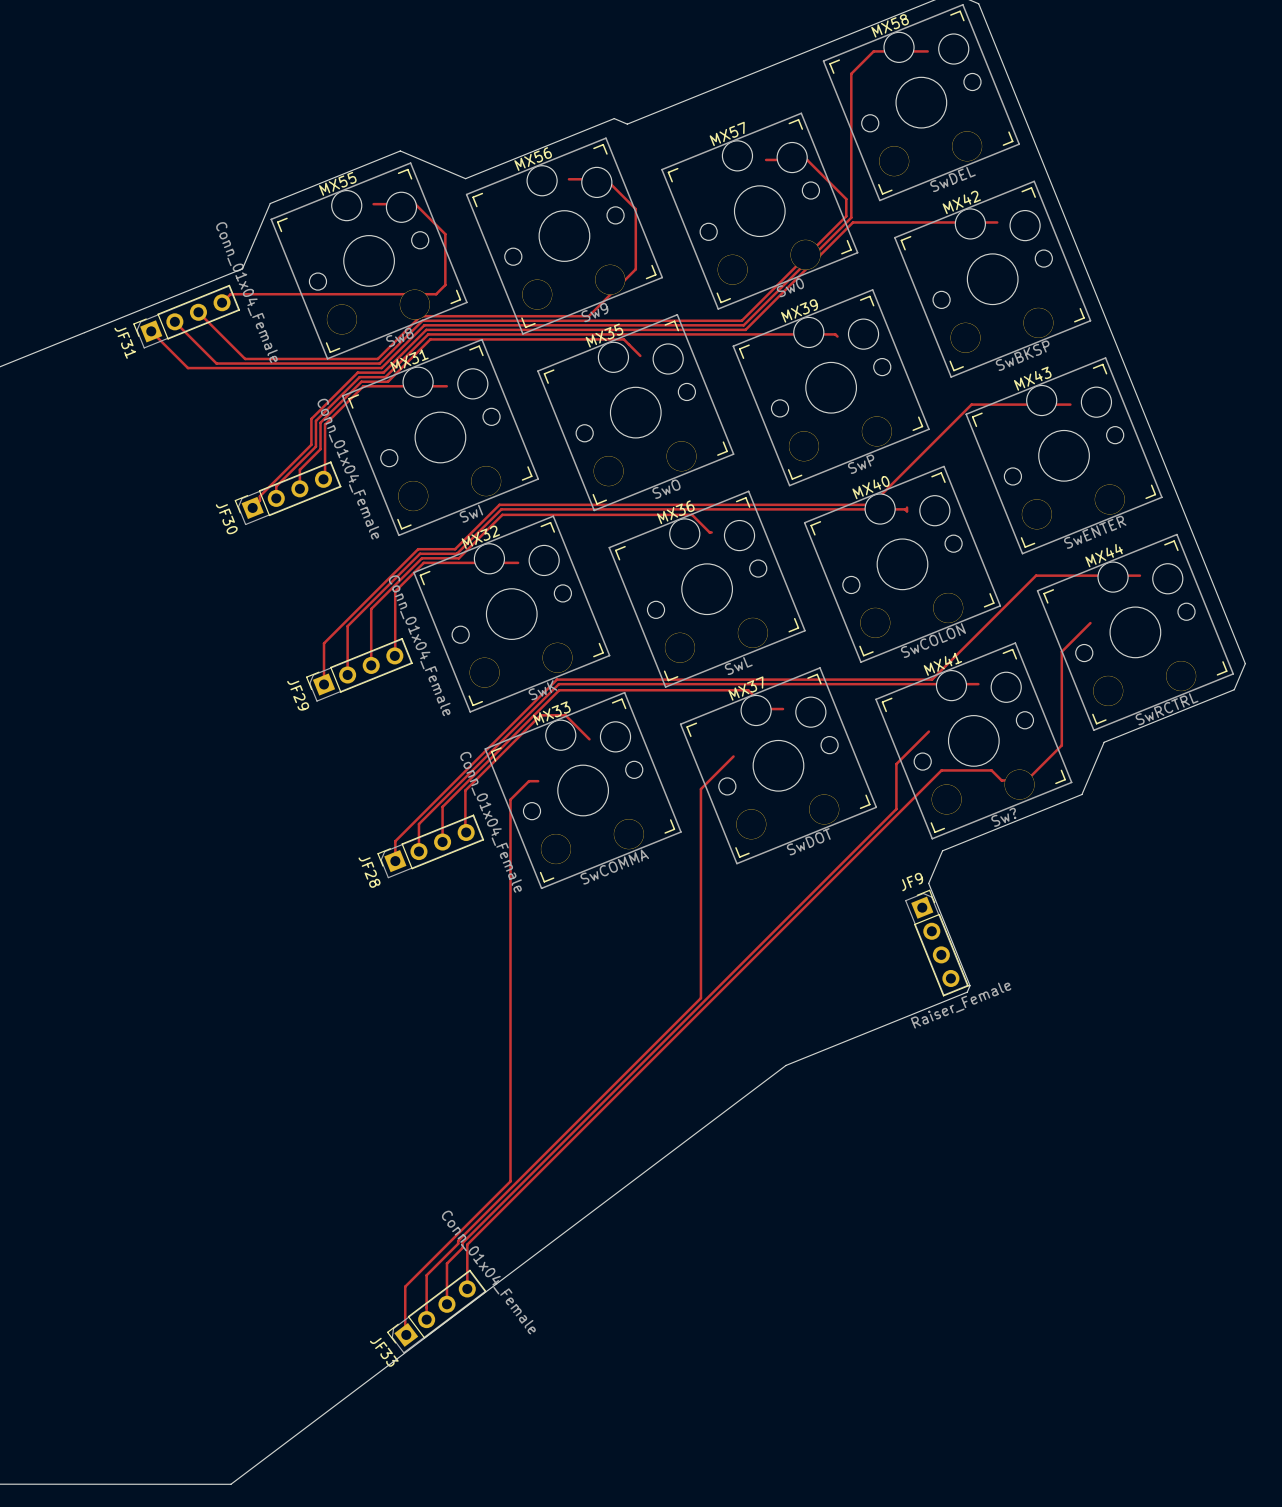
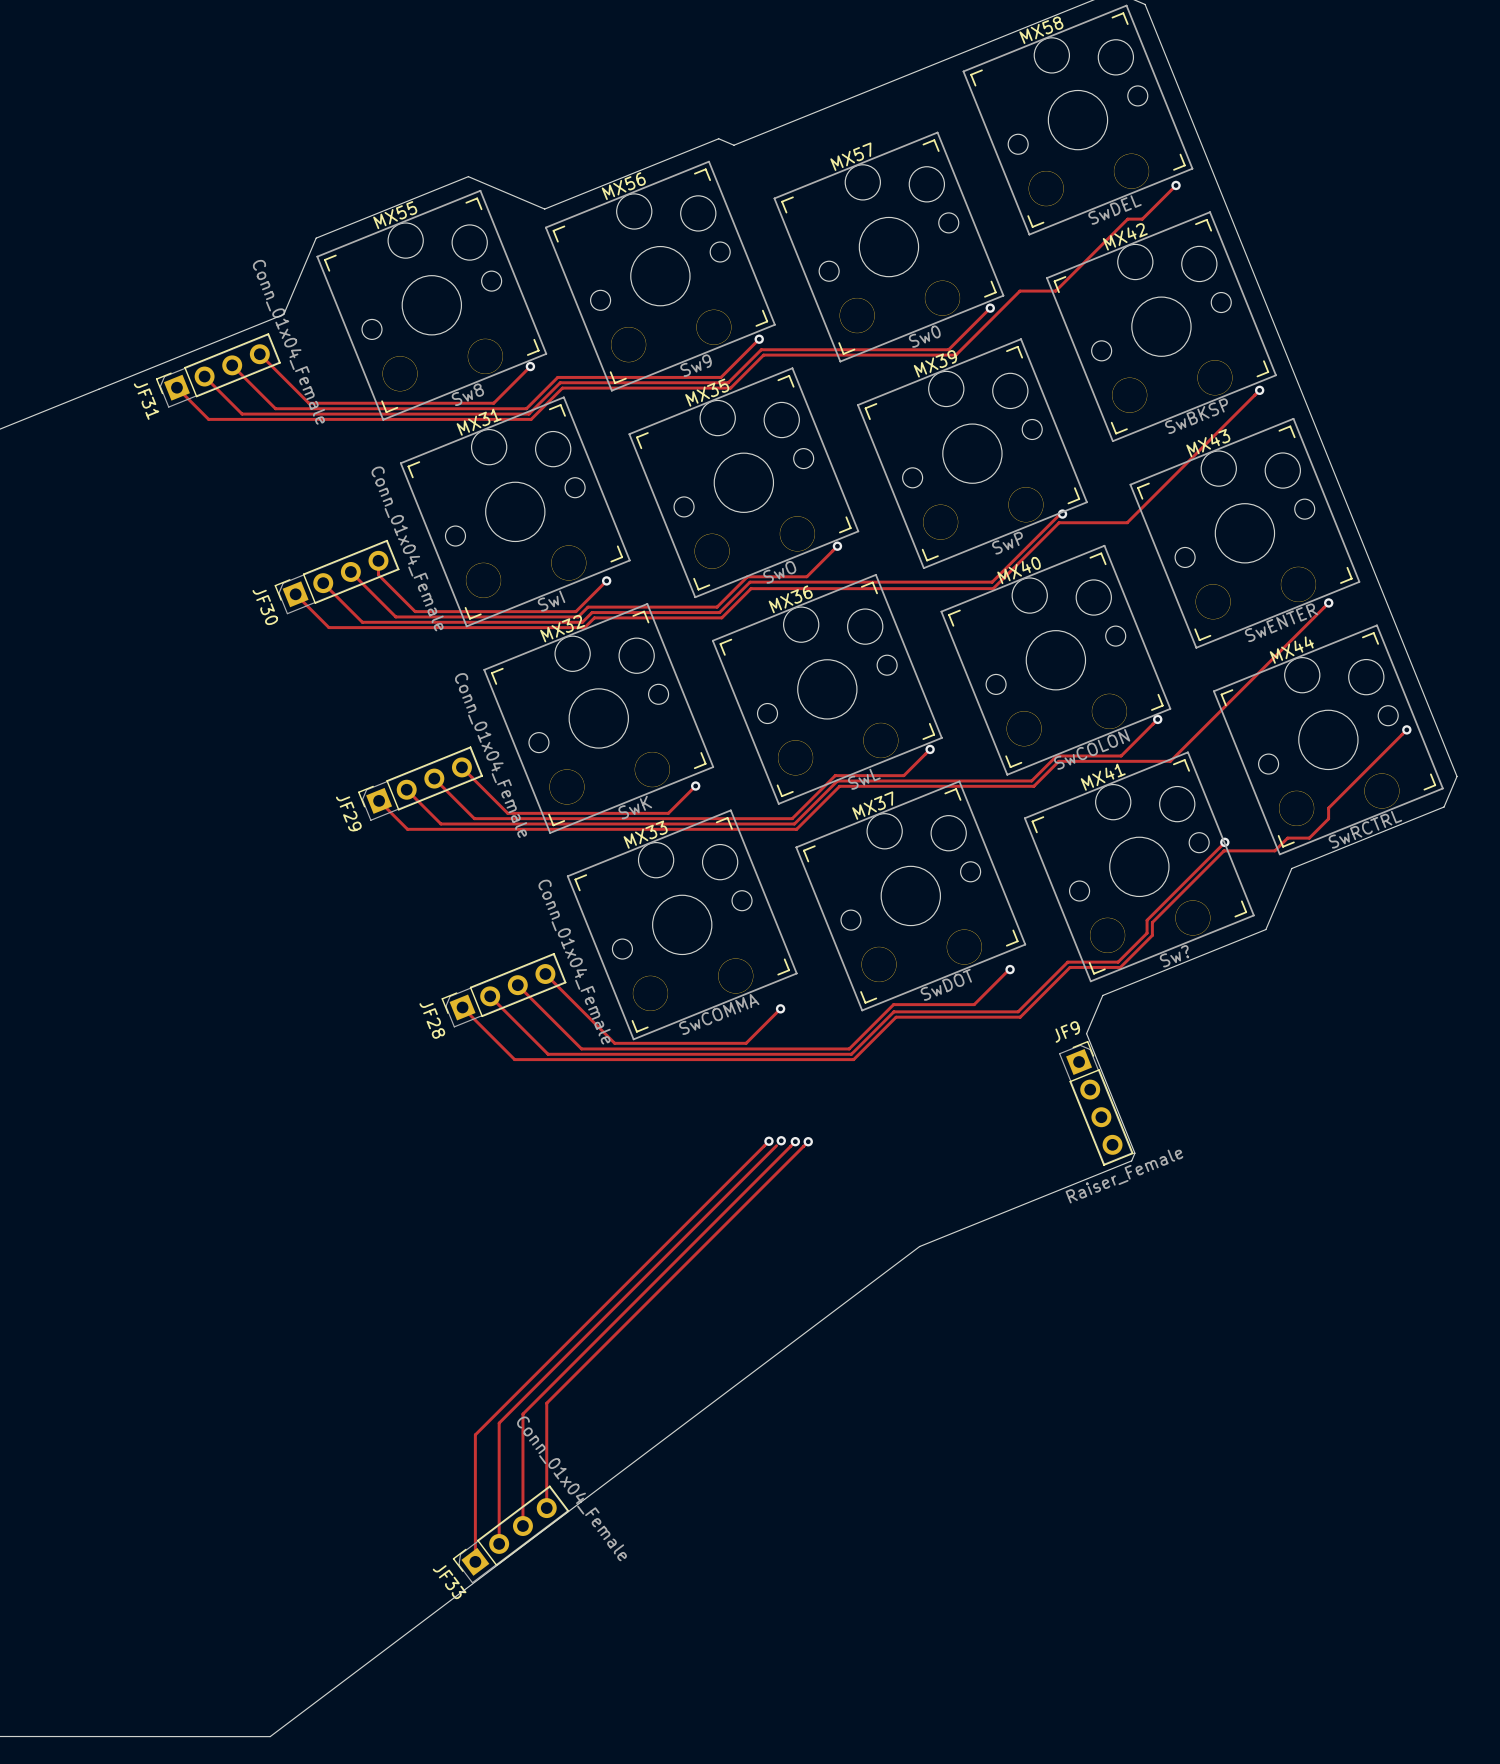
track: (927, 51) (873, 51) (851, 73) (851, 217) (743, 325) (424, 325) (381, 368) (187, 368) (178, 358) -> (1176, 185) (1142, 219) (1127, 219) (1055, 291) (1019, 291) (955, 355) (763, 355) (730, 388) (562, 388) (531, 419) (208, 419)
via: none -> (1176, 185)
track: (766, 159) (807, 159) (846, 199) (846, 216) (741, 320) (422, 320) (379, 363) (216, 363) (206, 353) -> (990, 308) (948, 349) (761, 349) (728, 382) (560, 382) (528, 414) (242, 414)
track: (568, 179) (605, 179) (635, 209) (635, 269) (588, 316) (420, 316) (377, 358) (245, 358) (235, 349) -> (759, 339) (721, 377) (557, 377) (526, 408) (275, 408)
track: (373, 204) (415, 204) (445, 234) (445, 285) (436, 294) (230, 294) (222, 302) -> (530, 366) (493, 403) (308, 403) (259, 354)
track: (997, 222) (852, 222) (745, 329) (426, 329) (383, 372) (357, 372) (311, 418) (311, 444) (259, 496) (259, 500) (252, 507) -> (1259, 390) (1127, 522) (1059, 522) (993, 588) (751, 588) (721, 617) (594, 617) (584, 627) (328, 627) (295, 594)
via: none -> (990, 308)
via: none -> (759, 339)
via: none -> (530, 366)
via: none -> (1259, 390)
track: (837, 336) (835, 334) (428, 334) (385, 377) (359, 377) (315, 420) (315, 446) (276, 486) (276, 498) -> (1062, 514) (1060, 514) (992, 582) (750, 582) (719, 612) (592, 612) (582, 622) (362, 622) (323, 583)
track: (640, 355) (623, 339) (430, 339) (388, 381) (361, 381) (320, 422) (320, 449) (299, 469) (299, 488) -> (837, 546) (806, 576) (747, 576) (717, 607) (587, 607) (578, 616) (395, 616) (350, 571)
track: (446, 386) (363, 386) (325, 424) (325, 477) (323, 479) -> (606, 580) (575, 611) (415, 611) (378, 574) (378, 560)
track: (1070, 404) (971, 404) (871, 504) (499, 504) (455, 549) (418, 549) (324, 643) (324, 684) -> (1328, 602) (1170, 761) (1058, 761) (1033, 786) (839, 786) (796, 829) (407, 829) (379, 800)
via: none -> (1062, 514)
via: none -> (837, 546)
via: none -> (606, 580)
track: (907, 507) (907, 511) (905, 509) (501, 509) (457, 553) (420, 553) (347, 626) (347, 674) -> (1157, 719) (1121, 756) (1056, 756) (1031, 780) (837, 780) (794, 824) (440, 824) (406, 789)
via: none -> (1328, 602)
track: (711, 532) (692, 514) (502, 514) (458, 558) (421, 558) (371, 609) (371, 665) -> (930, 749) (903, 775) (835, 775) (792, 818) (474, 818) (434, 778)
track: (518, 562) (423, 562) (395, 591) (394, 655) -> (695, 786) (668, 813) (507, 813) (461, 767)
track: (1139, 575) (1036, 575) (932, 679) (556, 679) (395, 841) (395, 861) -> (1406, 729) (1328, 808) (1328, 818) (1309, 838) (1287, 838) (1274, 850) (1224, 850) (1152, 922) (1152, 935) (1120, 967) (1070, 967) (1020, 1017) (896, 1017) (853, 1059) (514, 1059) (462, 1007)
via: none -> (1157, 719)
track: (1090, 623) (1061, 651) (1061, 745) (1026, 780) (1001, 780) (991, 770) (941, 770) (467, 1244) -> (808, 1141) (546, 1403) (546, 1456)
via: none -> (1406, 729)
via: none -> (930, 749)
via: none -> (695, 786)
track: (978, 684) (558, 684) (418, 824) (418, 851) -> (1224, 842) (1147, 920) (1147, 933) (1118, 962) (1067, 962) (1018, 1011) (893, 1011) (851, 1054) (548, 1054) (490, 996)
track: (783, 709) (767, 709) (748, 690) (559, 690) (442, 806) (442, 842) -> (1010, 969) (974, 1004) (893, 1004) (849, 1048) (581, 1048) (517, 985)
via: none -> (1224, 842)
track: (928, 731) (896, 764) (896, 809) (462, 1242) (462, 1247) (446, 1263) -> (795, 1141) (522, 1414) (522, 1478)
track: (589, 739) (565, 715) (540, 715) (465, 790) (466, 832) -> (780, 1008) (746, 1043) (614, 1043) (545, 974)
track: (733, 756) (700, 789) (700, 998) (458, 1240) (458, 1243) (426, 1275) -> (776, 1145) (499, 1423) (499, 1492)
track: (538, 781) (528, 781) (510, 799) (510, 1181) (405, 1286) (406, 1334) -> (768, 1141) (475, 1434) (475, 1561)
via: none -> (1010, 969)
via: none -> (780, 1008)
via: none -> (768, 1141)
via: none -> (781, 1140)
via: none -> (795, 1141)
via: none -> (808, 1141)

